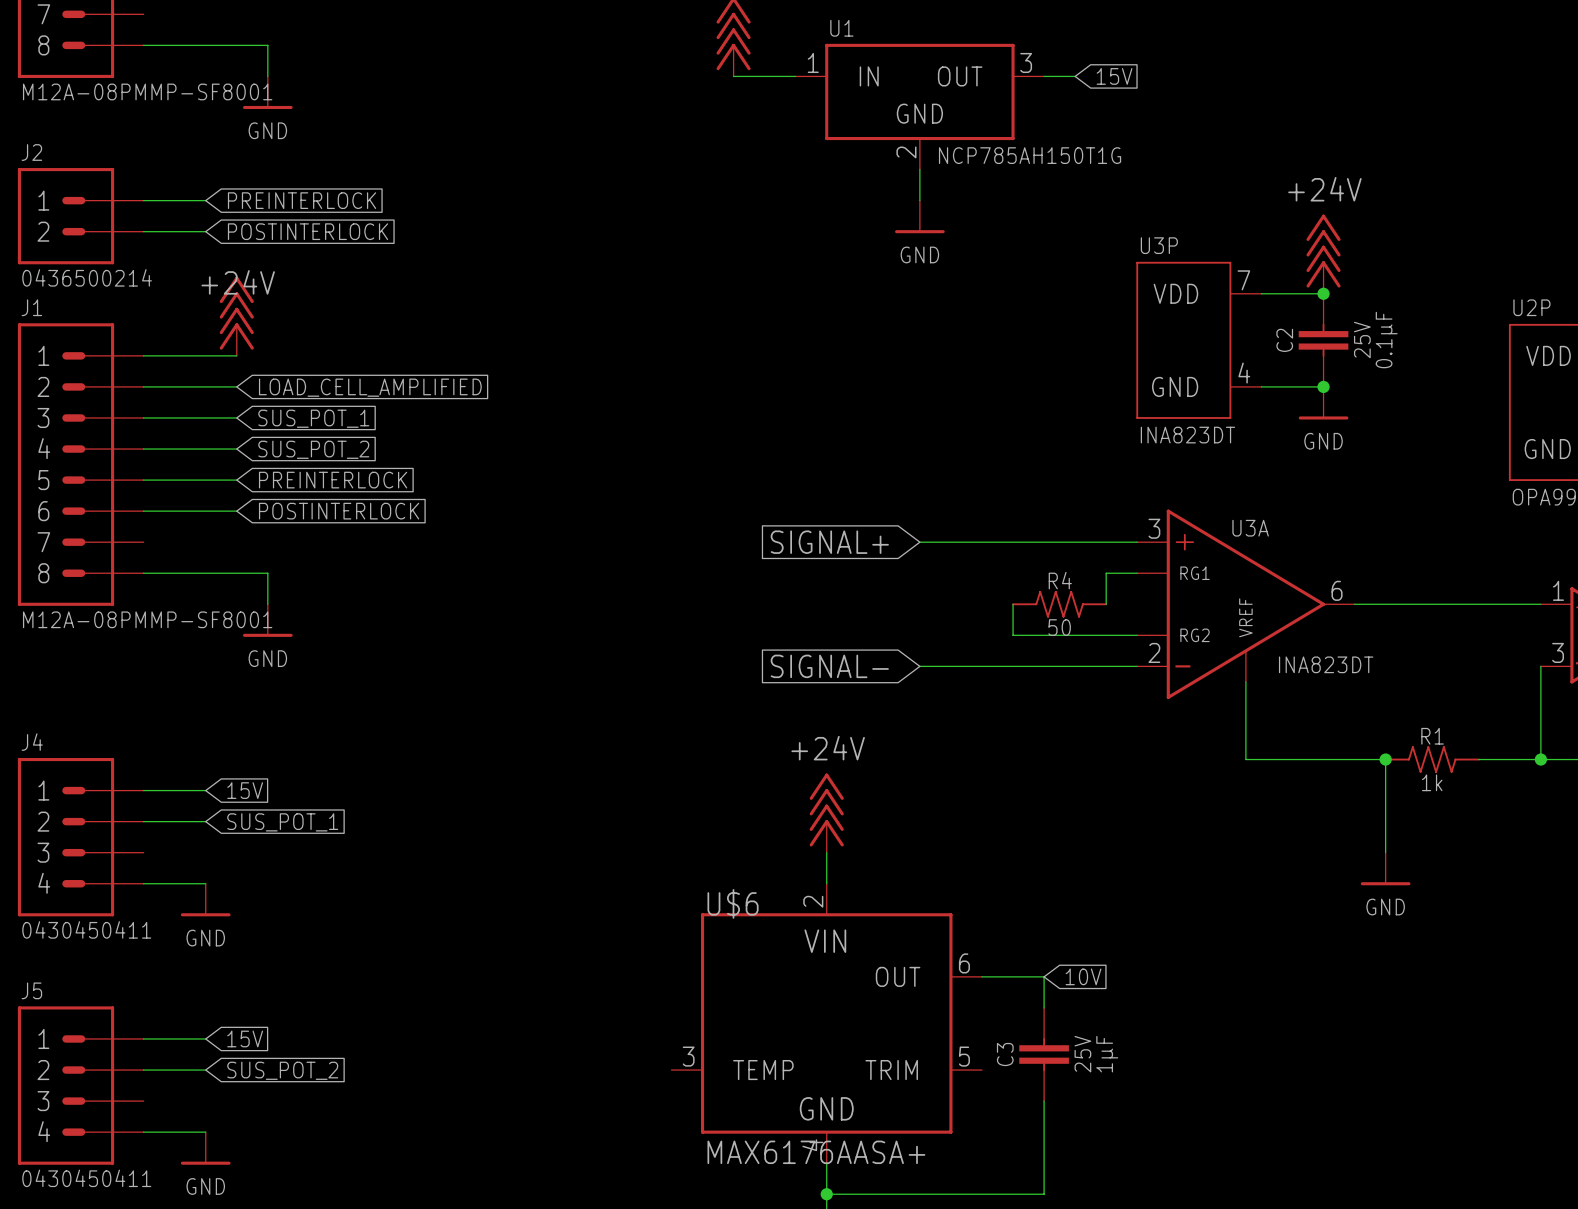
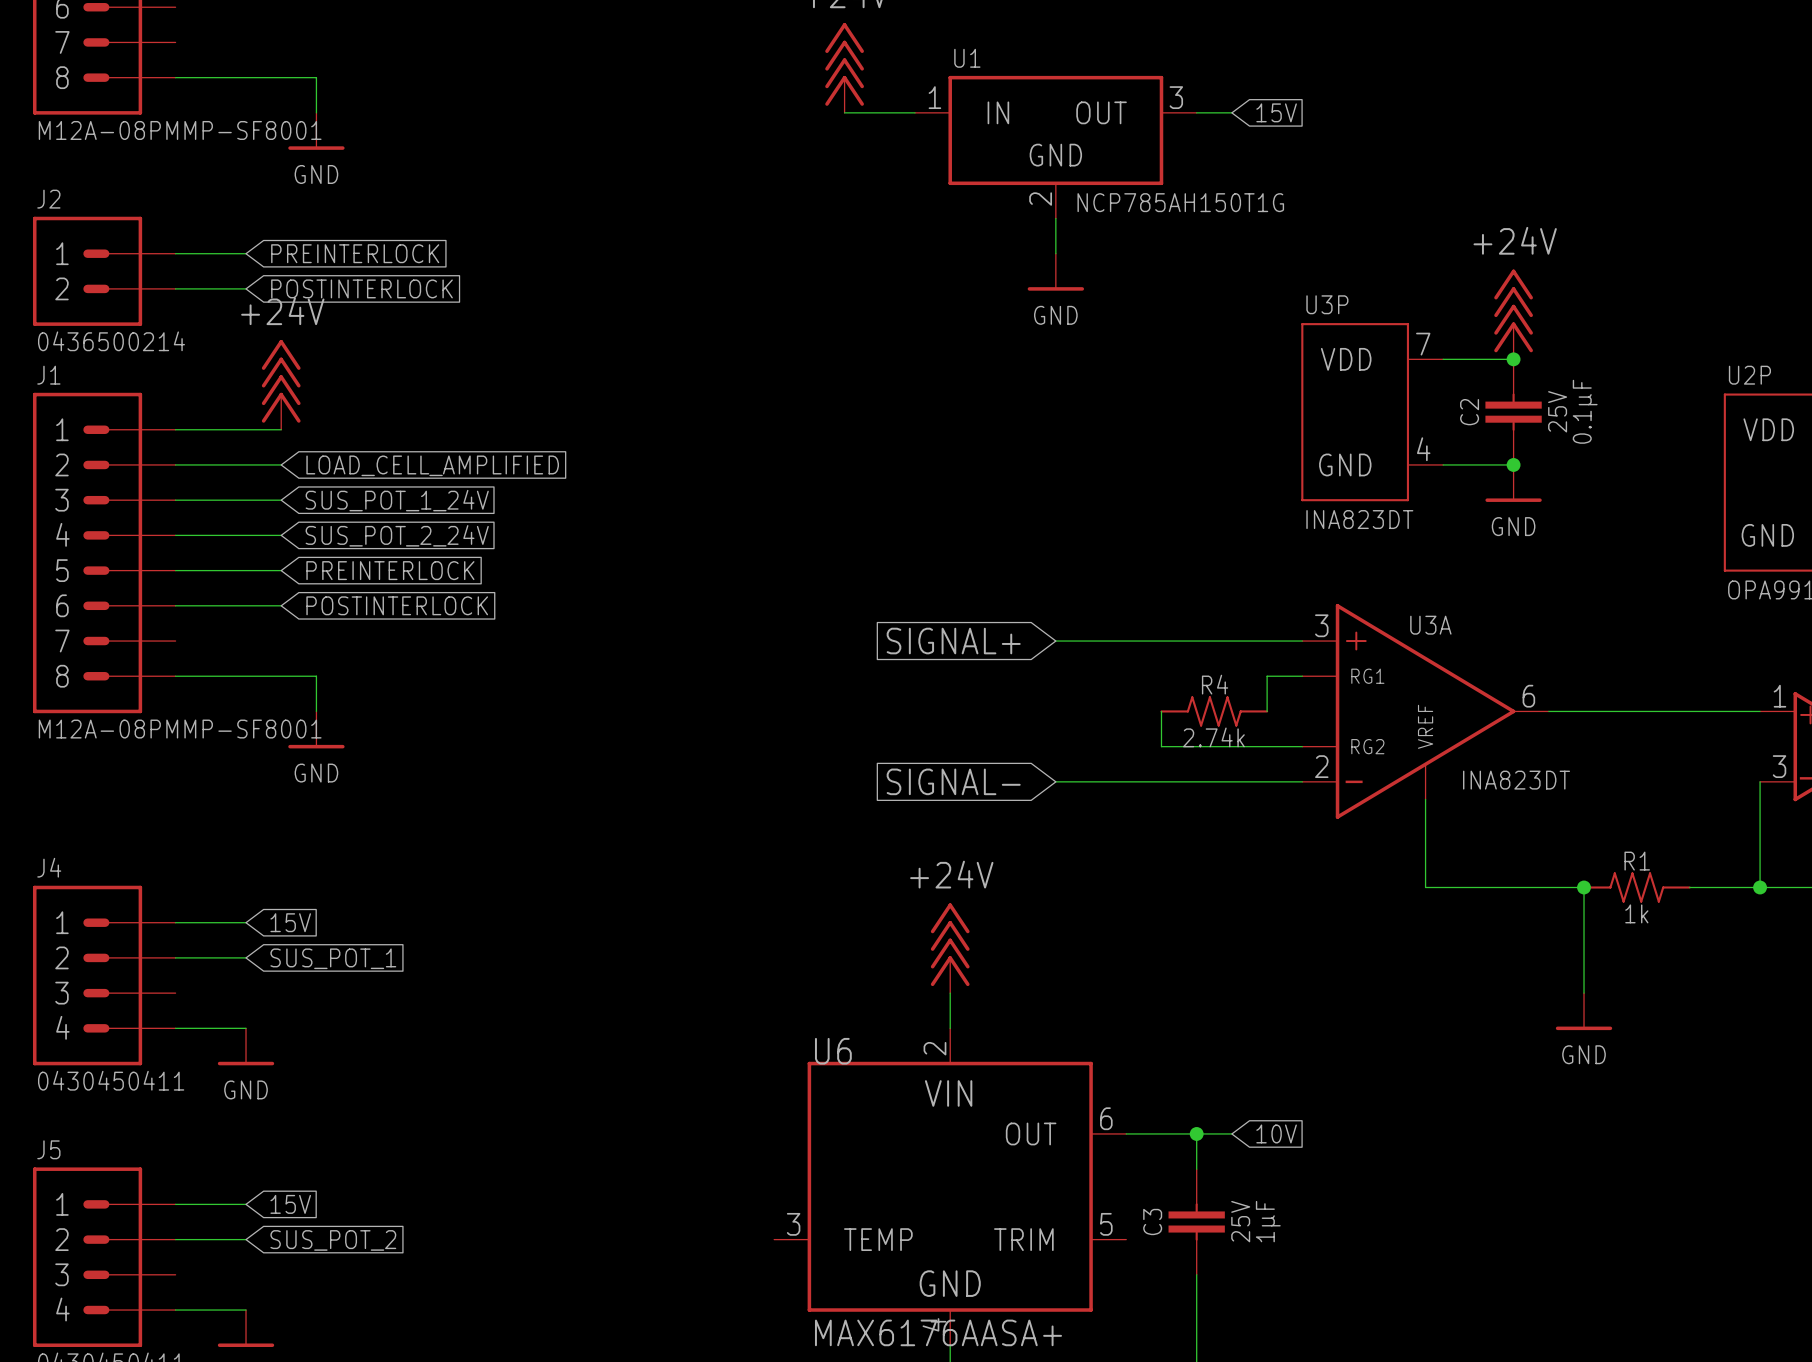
power symbol text position: +24V (238, 282) -> +24V (282, 311)
global label: SUS_POT_1 (313, 418) -> SUS_POT_1_24V (397, 500)
global label: SUS_POT_2 (313, 449) -> SUS_POT_2_24V (397, 535)
R4 text: 50 (1059, 627) -> 2.74k (1213, 737)
U$6 name: U$6 (733, 903) -> U6 (833, 1051)
wire: none -> (1196, 1133) (1231, 1133)
junction: none -> (1196, 1133)
global label position: 10V (1083, 976) -> 10V (1276, 1133)

